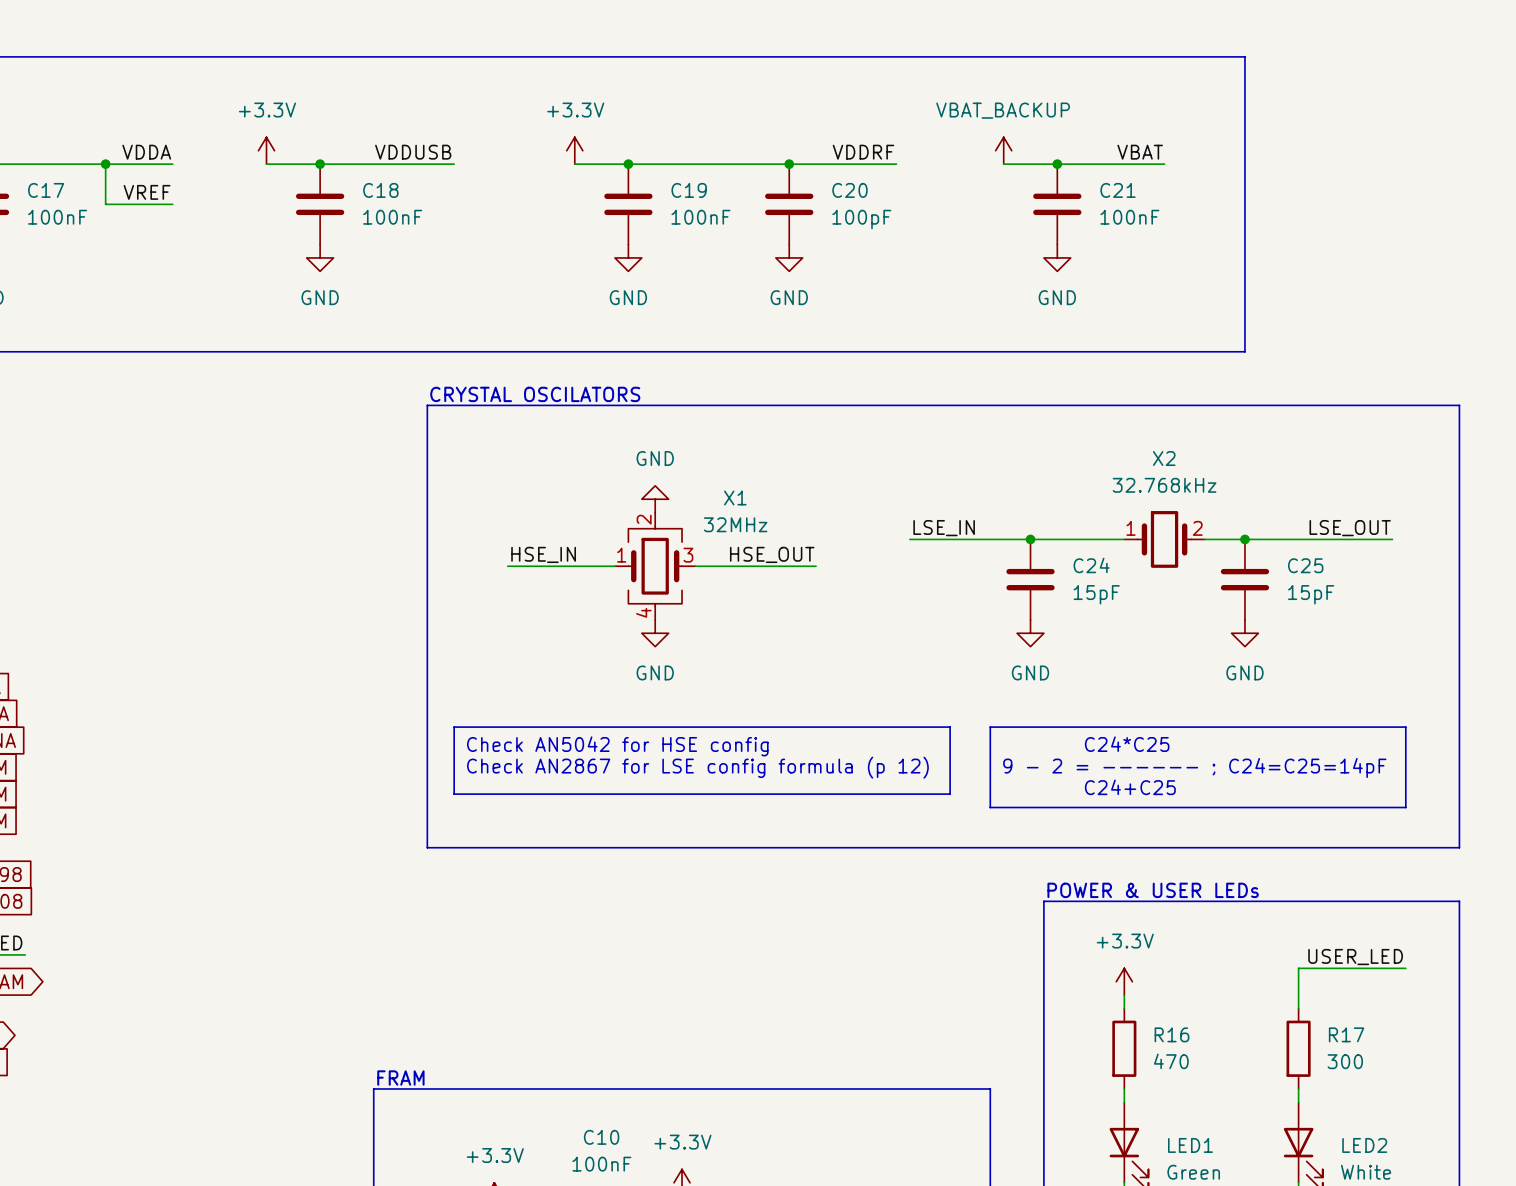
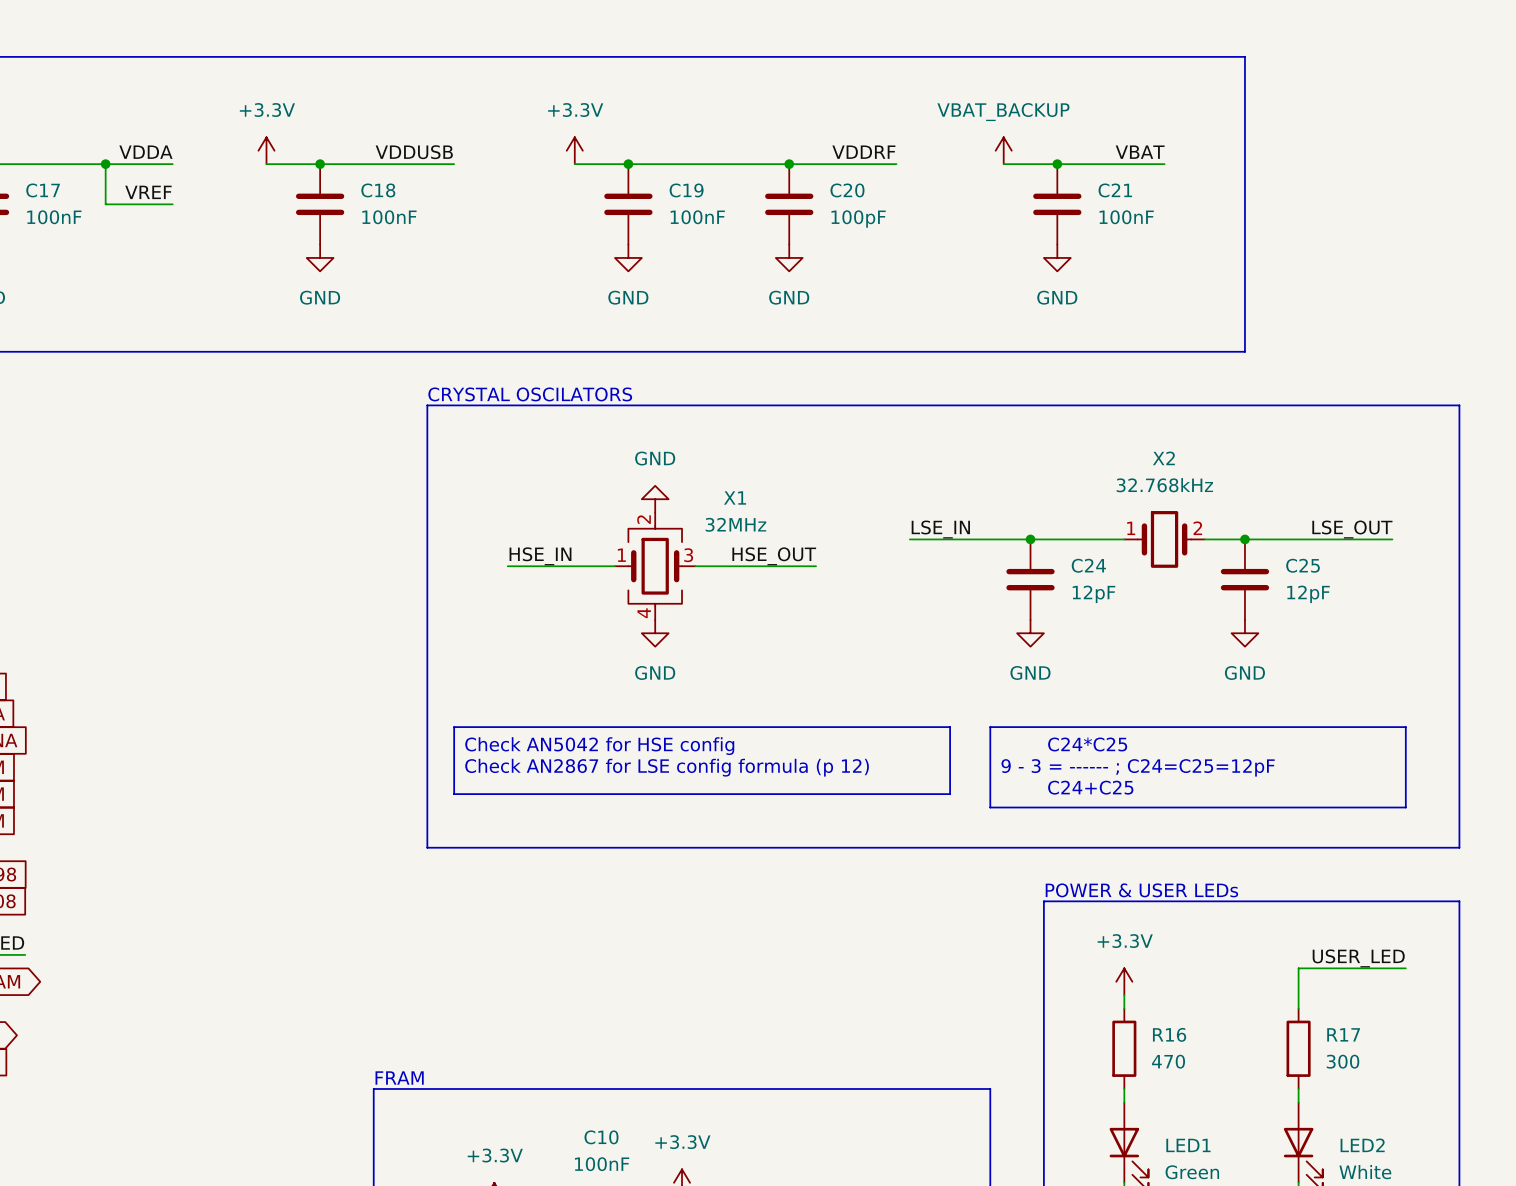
C24 value: 15pF (1096, 594) -> 12pF (1094, 594)
C25 value: 15pF (1311, 594) -> 12pF (1308, 594)
text: 9 - 2 = ------ ; C24=C25=14pF (1194, 767) -> 9 - 3 = ------ ; C24=C25=12pF (1138, 767)

